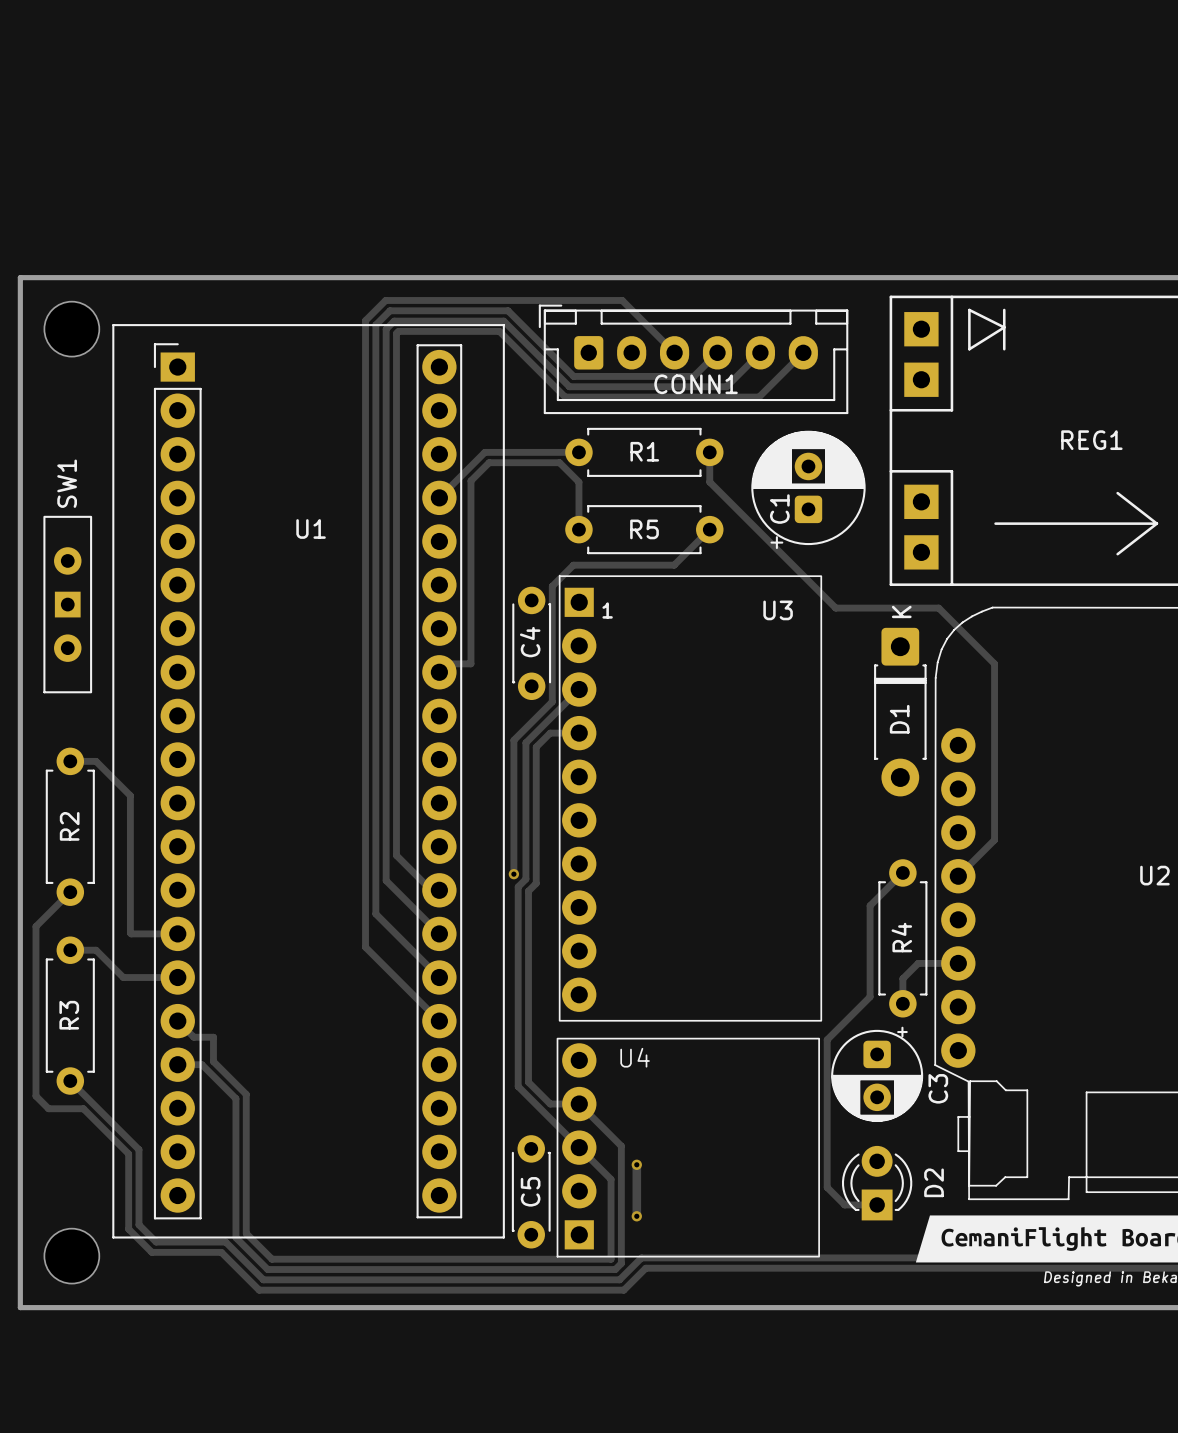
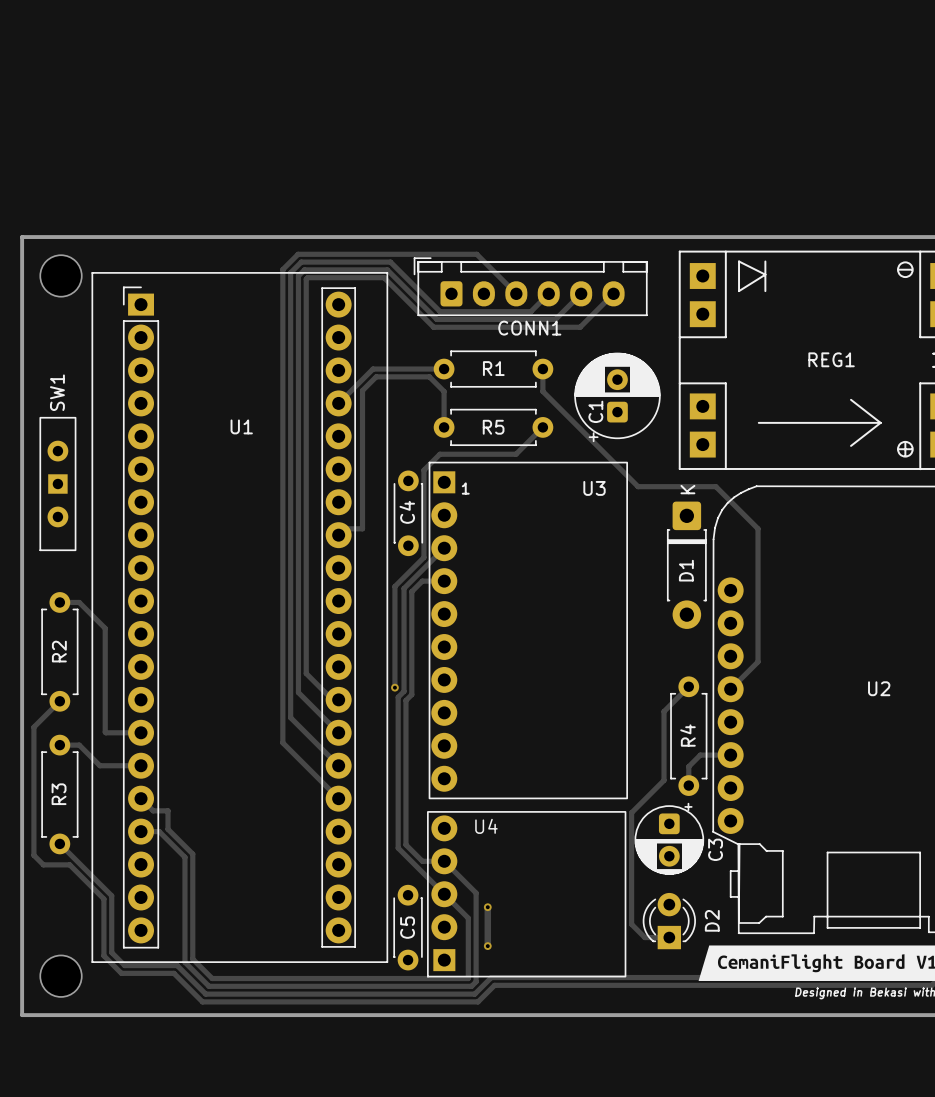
CONN1 footprint: [538, 304, 849, 415] -> [413, 257, 648, 317]

